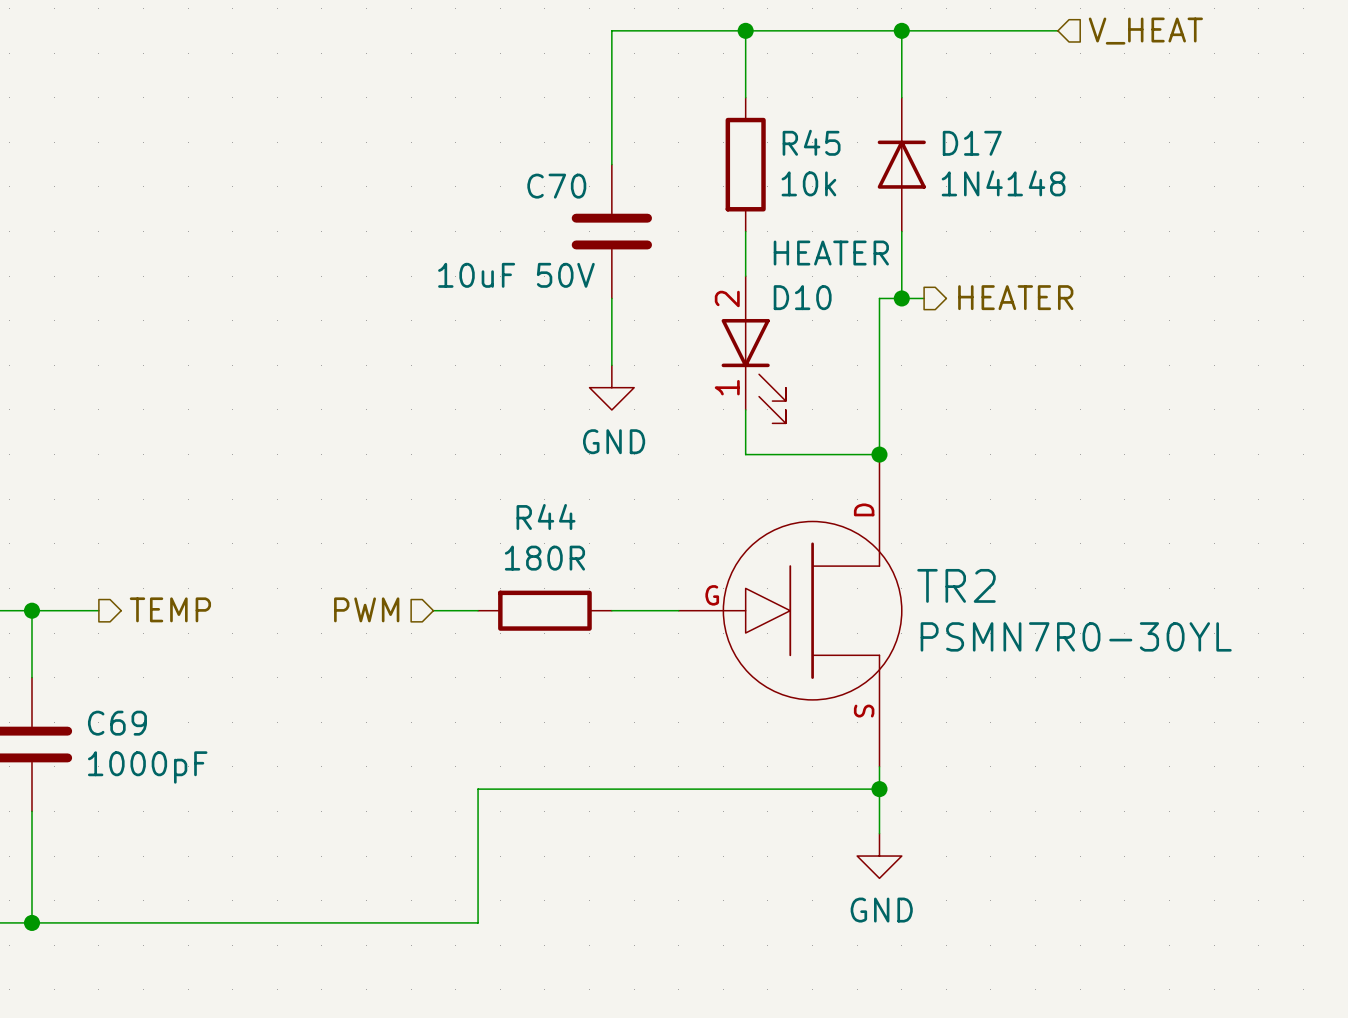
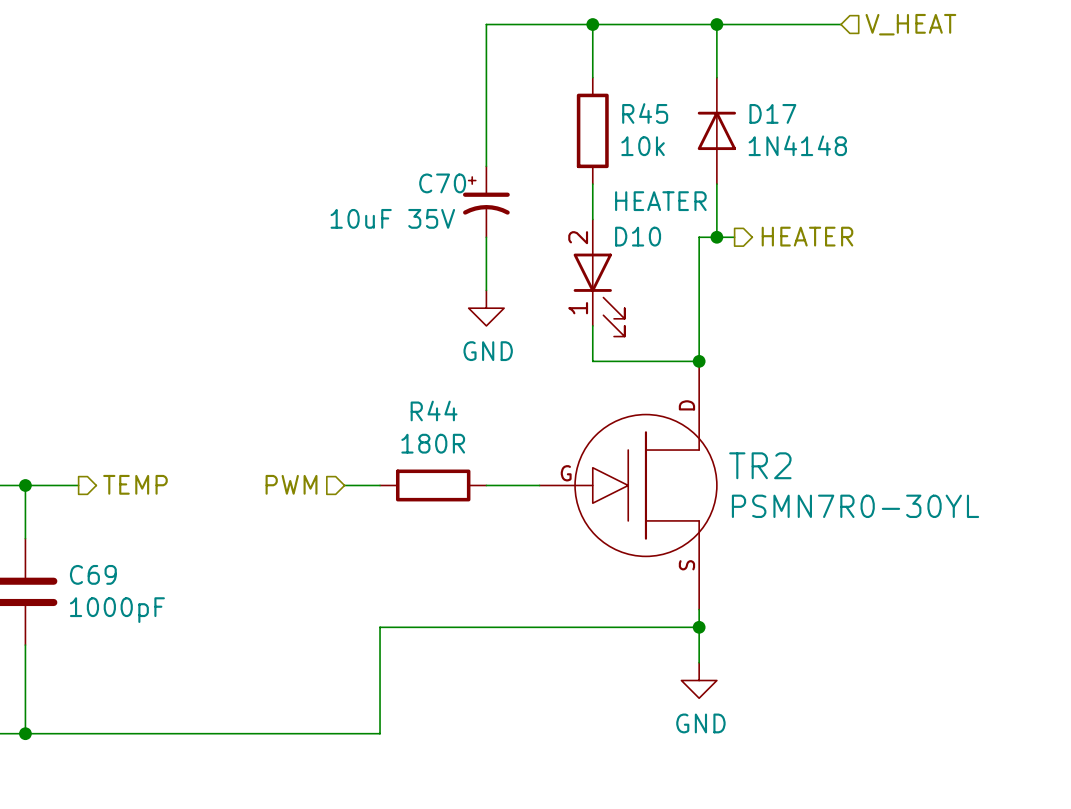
C70 symbol: [571, 164, 653, 299] -> [462, 166, 510, 238]
C70 value: 10uF 50V (516, 275) -> 10uF 35V (392, 218)

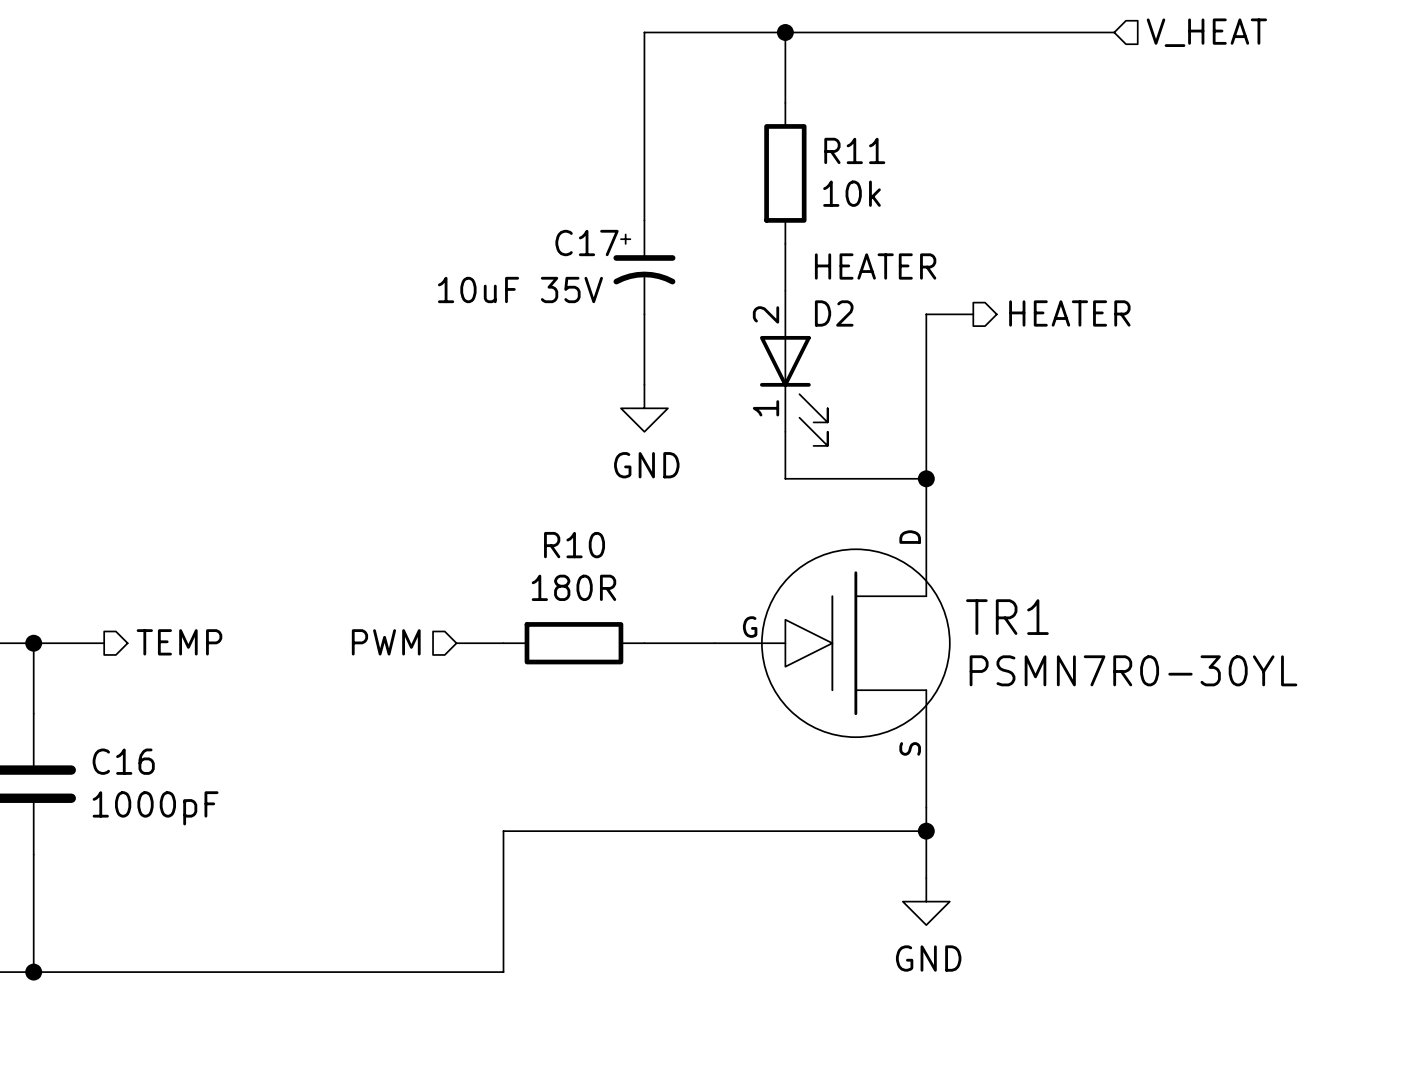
wire: (716, 24) (716, 77) -> none
junction: (716, 24) -> none
R45 name: R45 (645, 113) -> R11 (854, 150)
D17: 1N4148 (716, 130) -> none
C70 name: C70 (442, 183) -> C17 (587, 243)
wire: (716, 184) (716, 237) -> none
D10 name: D10 (638, 236) -> D2 (834, 313)
junction: (716, 237) -> none
R44 name: R44 (434, 410) -> R10 (574, 545)
TR2 name: TR2 (760, 465) -> TR1 (1007, 617)
C69 name: C69 (93, 574) -> C16 (123, 761)

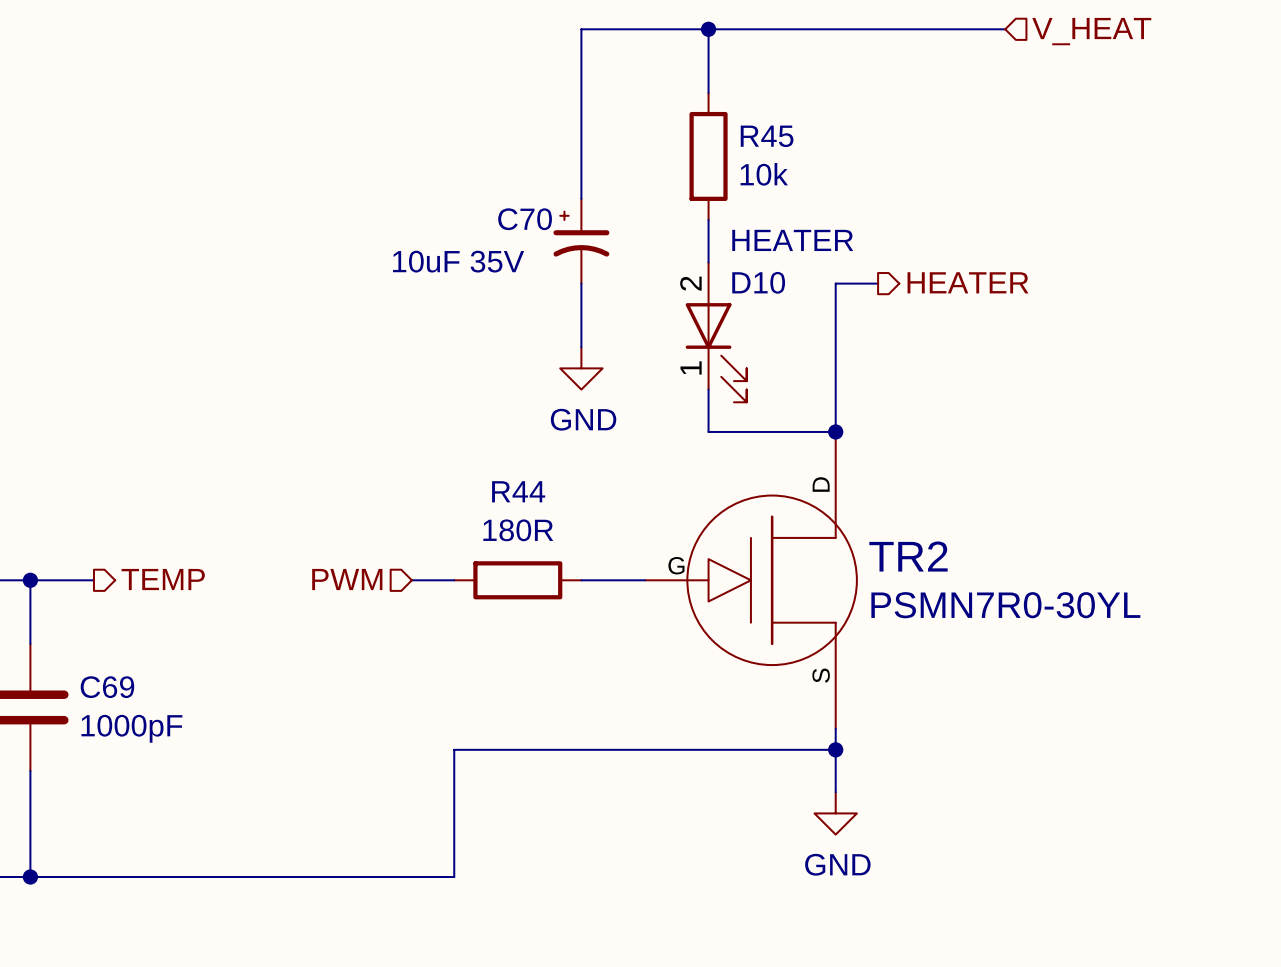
R11 name: R11 (854, 150) -> R45 (767, 136)
C17 name: C17 (587, 243) -> C70 (525, 219)
D2 name: D2 (834, 313) -> D10 (758, 282)
R10 name: R10 (574, 545) -> R44 (518, 491)
TR1 name: TR1 (1007, 617) -> TR2 (908, 556)
C16 name: C16 (123, 761) -> C69 (107, 687)

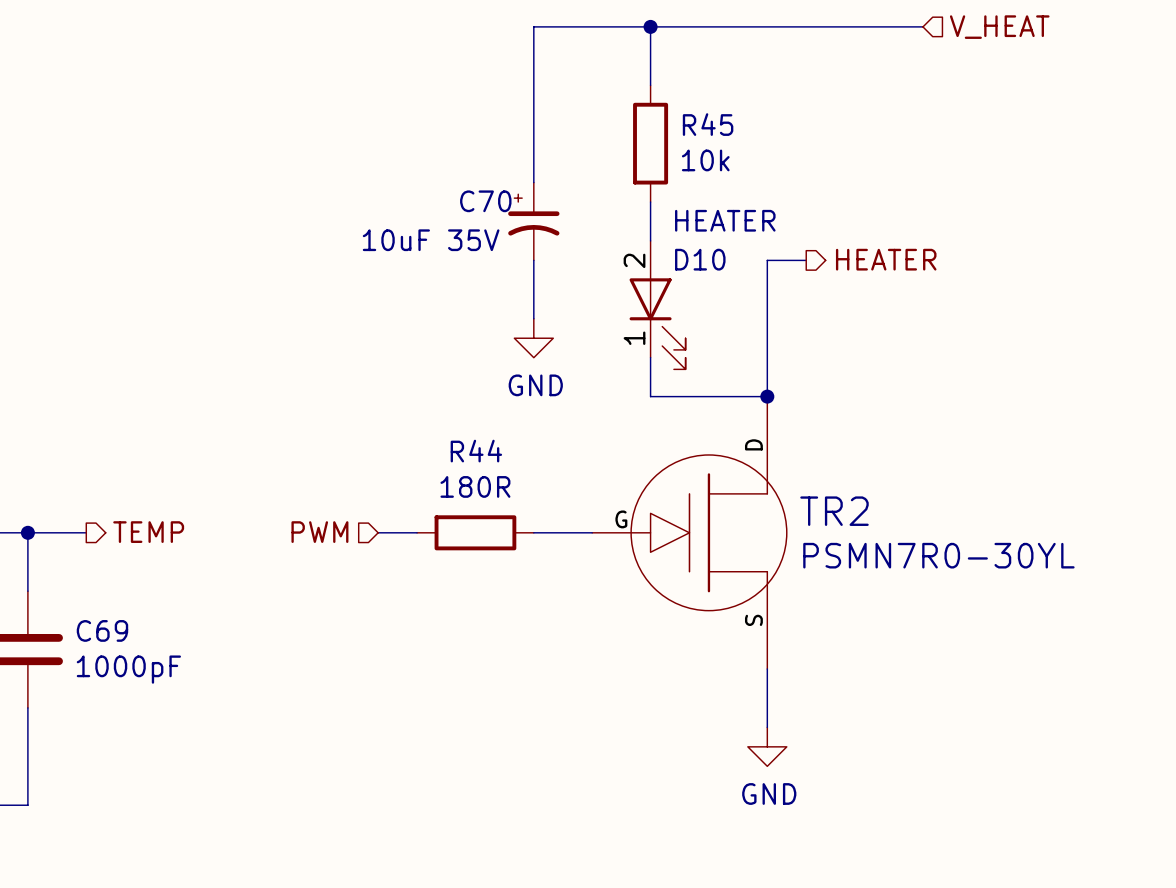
wire: (835, 749) (454, 749) (454, 876) (30, 876) -> none
junction: (835, 749) -> none
junction: (30, 876) -> none

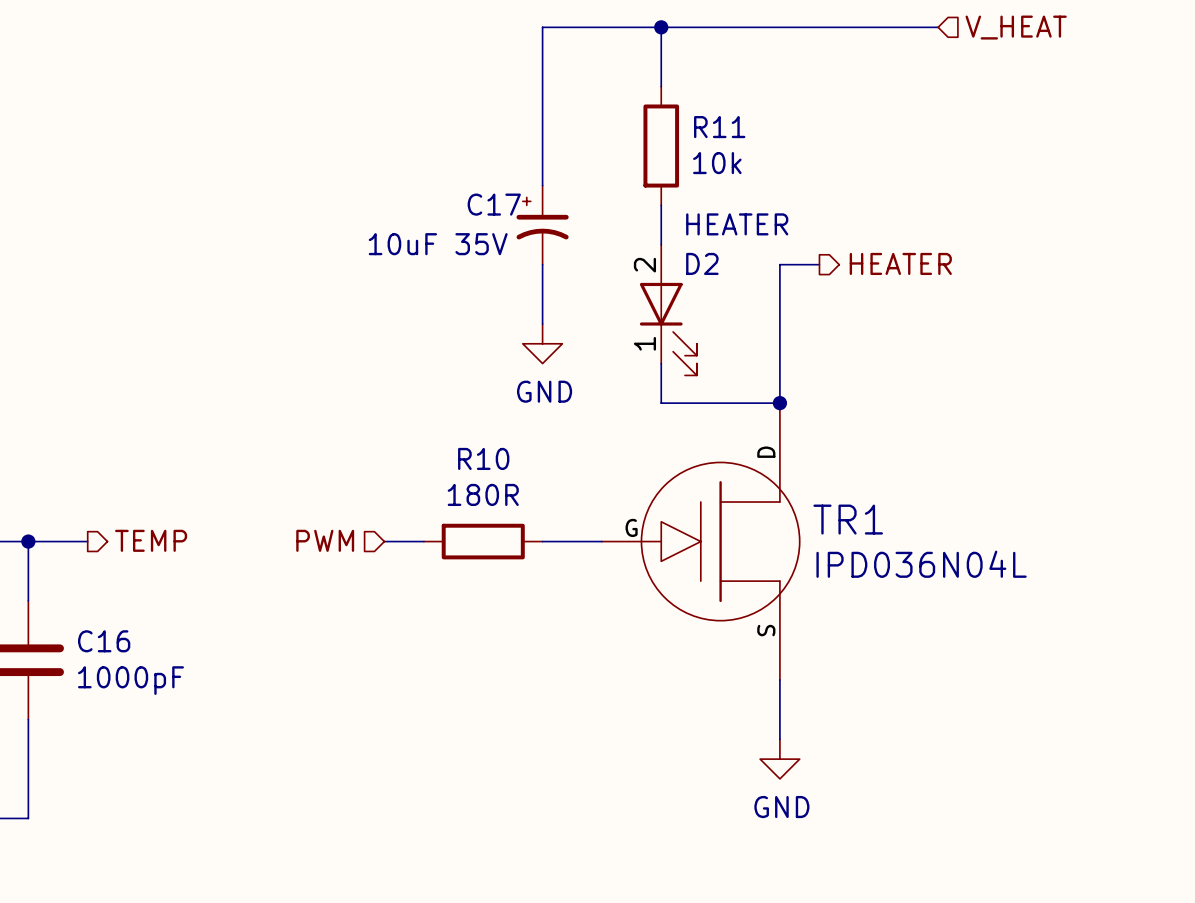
R45 name: R45 (708, 124) -> R11 (719, 127)
C70 name: C70 (485, 201) -> C17 (494, 204)
D10 name: D10 (700, 259) -> D2 (702, 263)
R44 name: R44 (476, 451) -> R10 (483, 458)
TR2 name: TR2 (834, 511) -> TR1 (848, 519)
TR2 value: PSMN7R0-30YL (938, 555) -> IPD036N04L (921, 564)
C69 name: C69 (102, 630) -> C16 (104, 641)

